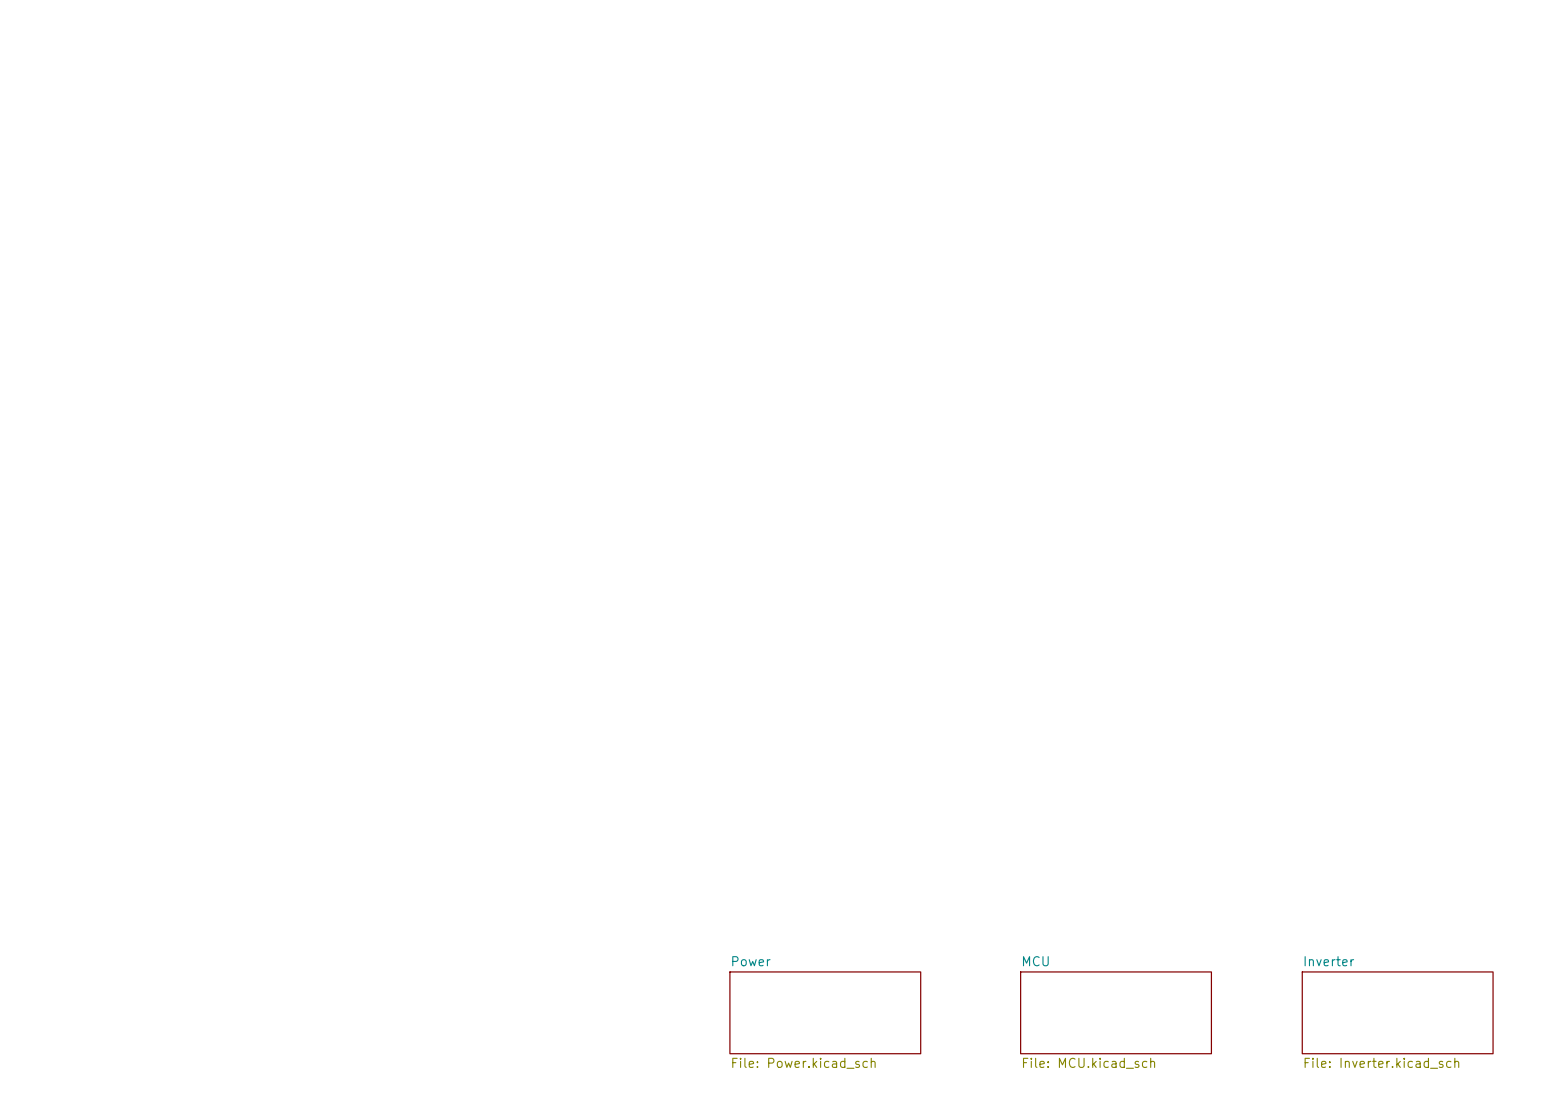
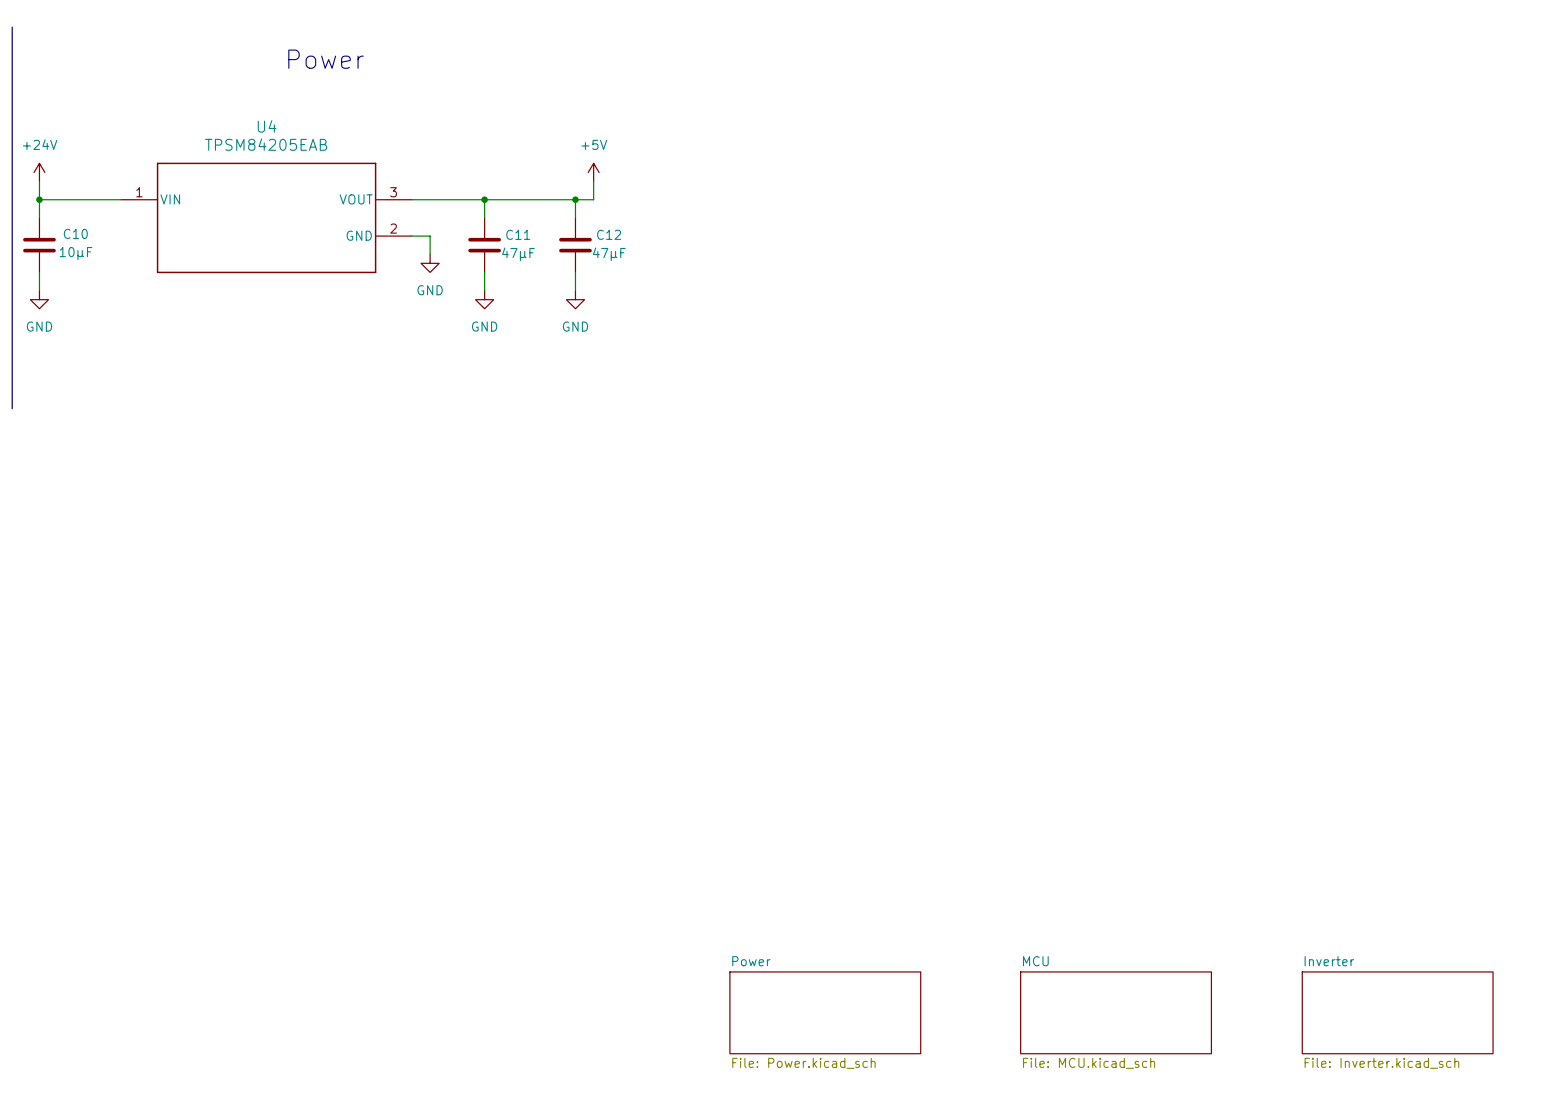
line: none -> (12, 27) (12, 408)
text: none -> Power (326, 59)
power symbol: none -> +24V (39, 172)
power symbol: none -> +5V (593, 172)
wire: none -> (39, 181) (39, 217)
wire: none -> (593, 181) (593, 199) (411, 199)
wire: none -> (39, 199) (121, 199)
junction: none -> (39, 199)
wire: none -> (484, 199) (484, 217)
junction: none -> (484, 199)
wire: none -> (575, 199) (575, 217)
junction: none -> (575, 199)
U4: none -> TPSM84205EAB (266, 217)
wire: none -> (411, 236) (430, 236) (430, 254)
C10: none -> 10μF (39, 245)
C11: none -> 47μF (484, 245)
C12: none -> 47μF (575, 245)
power symbol: none -> GND (430, 263)
wire: none -> (39, 272) (39, 290)
wire: none -> (484, 272) (484, 290)
wire: none -> (575, 272) (575, 290)
power symbol: none -> GND (39, 299)
power symbol: none -> GND (484, 299)
power symbol: none -> GND (575, 299)

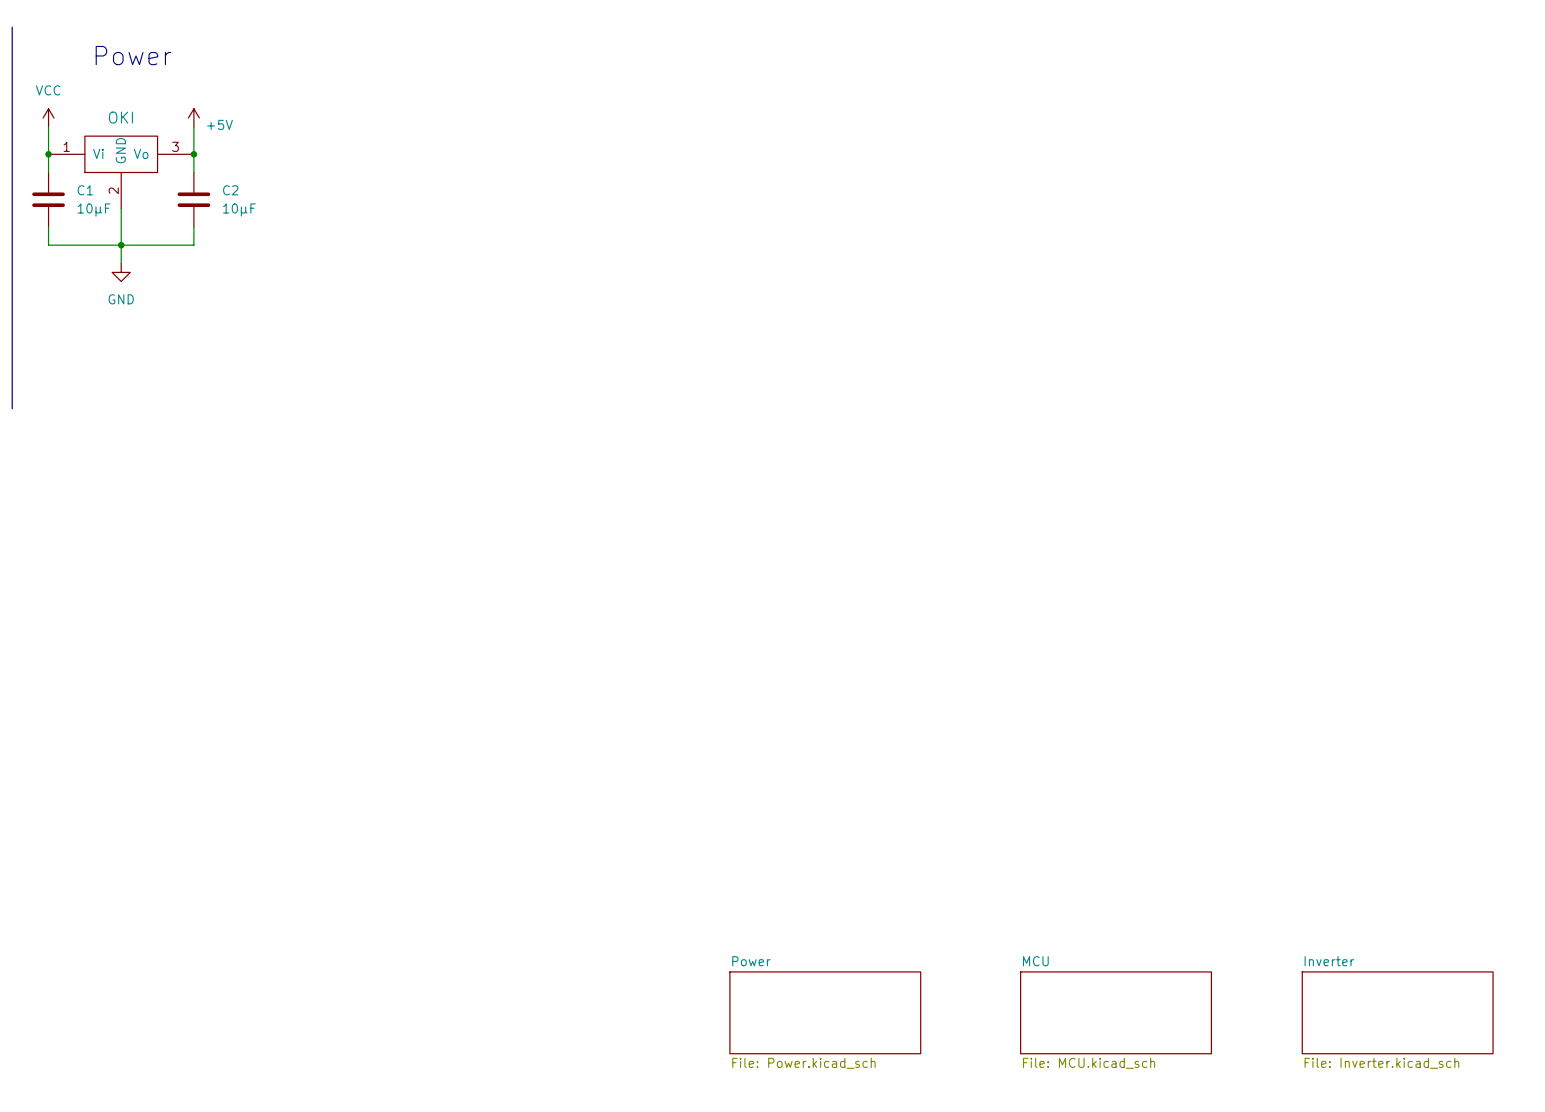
text: none -> Power (133, 55)
text: Power (326, 59) -> none
power symbol: none -> VCC (48, 117)
power symbol: none -> +5V (193, 117)
wire: none -> (48, 127) (48, 172)
wire: none -> (193, 127) (193, 172)
junction: none -> (48, 154)
junction: none -> (193, 154)
power symbol: +24V (39, 172) -> none
part: none -> OKI (121, 172)
power symbol: +5V (593, 172) -> none
wire: (39, 181) (39, 217) -> none
wire: (593, 181) (593, 199) (411, 199) -> none
wire: (39, 199) (121, 199) -> none
junction: (39, 199) -> none
C1: none -> 10µF (48, 199)
C2: none -> 10µF (193, 199)
wire: (484, 199) (484, 217) -> none
junction: (484, 199) -> none
wire: (575, 199) (575, 217) -> none
junction: (575, 199) -> none
wire: none -> (121, 208) (121, 263)
U4: TPSM84205EAB (266, 217) -> none
wire: none -> (48, 226) (48, 245) (193, 245) (193, 226)
wire: (411, 236) (430, 236) (430, 254) -> none
C10: 10μF (39, 245) -> none
junction: none -> (121, 245)
C11: 47μF (484, 245) -> none
C12: 47μF (575, 245) -> none
power symbol: GND (430, 263) -> none
wire: (39, 272) (39, 290) -> none
wire: (484, 272) (484, 290) -> none
wire: (575, 272) (575, 290) -> none
power symbol position: GND (39, 299) -> GND (121, 272)
power symbol: GND (484, 299) -> none
power symbol: GND (575, 299) -> none

